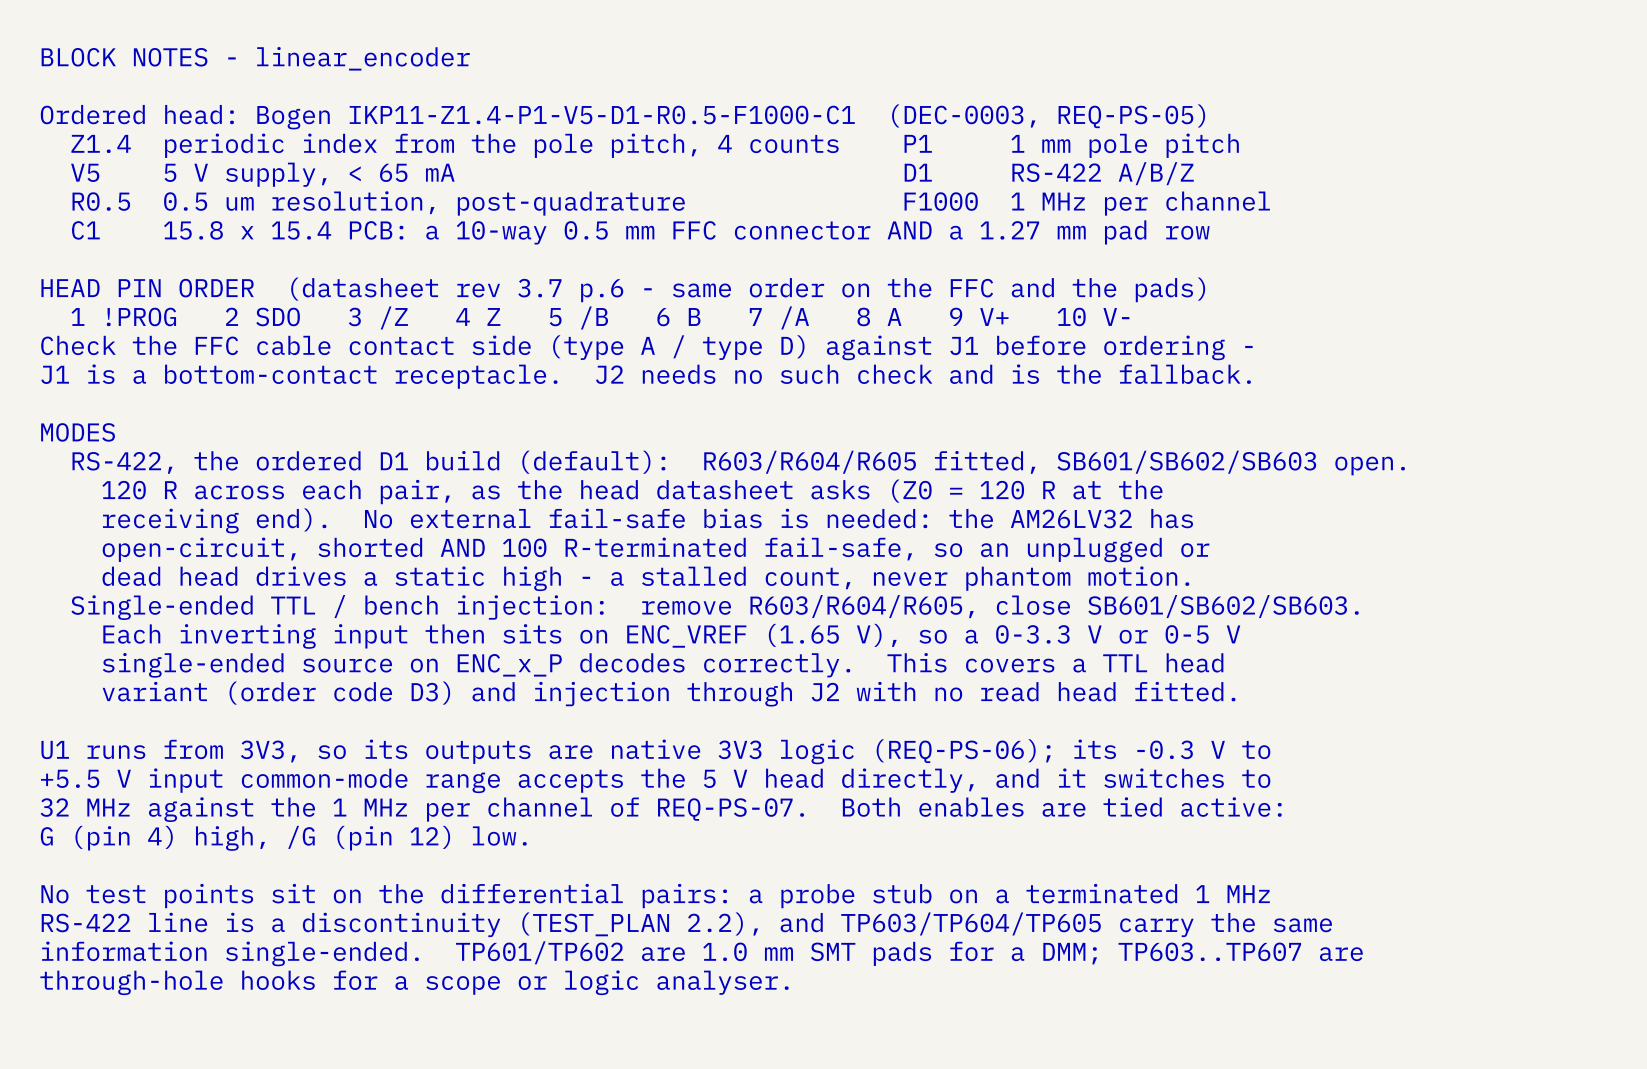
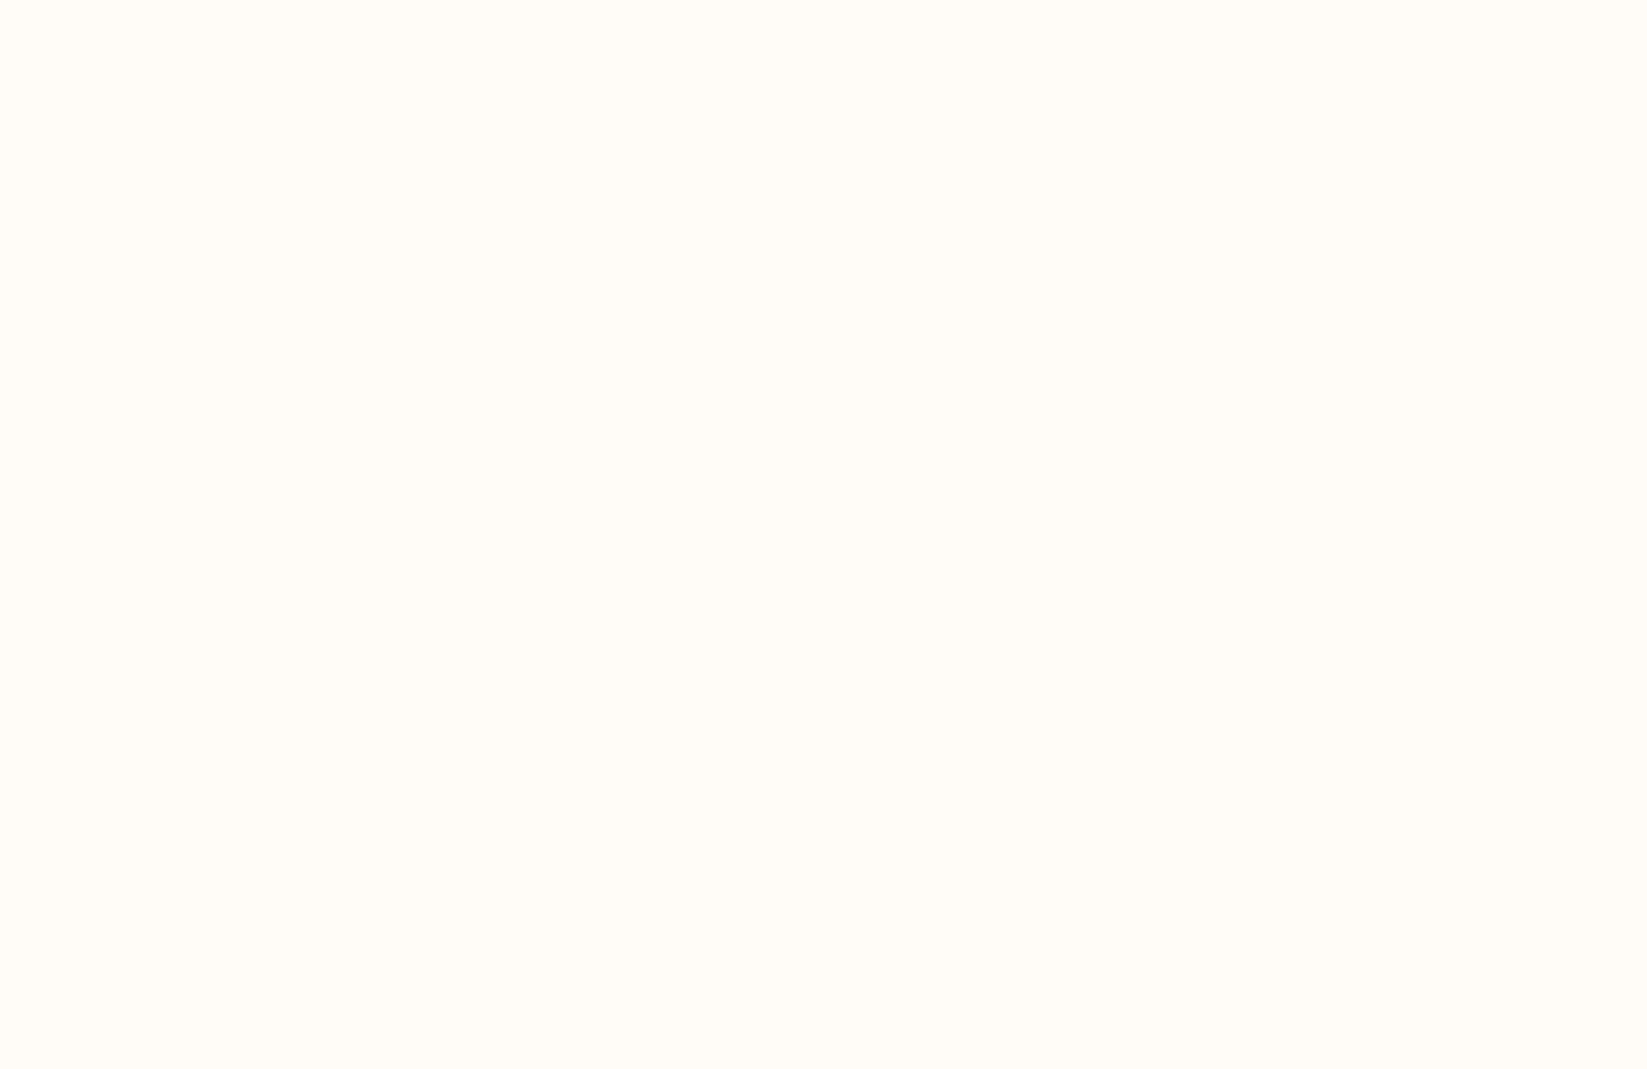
text: BLOCK NOTES - linear_encoder (255, 58) -> none
text: Ordered head: Bogen IKP11-Z1.4-P1-V5-D1-R0.5-F1000-C1 (DEC-0003, REQ-PS-05) (622, 116) -> none
text: Z1.4 periodic index from the pole pitch, 4 counts P1 1 mm pole pitch (655, 145) -> none
text: V5 5 V supply, < 65 mA D1 RS-422 A/B/Z (632, 174) -> none
text: R0.5 0.5 um resolution, post-quadrature F1000 1 MHz per channel (671, 203) -> none
text: C1 15.8 x 15.4 PCB: a 10-way 0.5 mm FFC connector AND a 1.27 mm pad row (640, 232) -> none
text: HEAD PIN ORDER (datasheet rev 3.7 p.6 - same order on the FFC and the pads) (623, 289) -> none
text: 1 !PROG 2 SDO 3 /Z 4 Z 5 /B 6 B 7 /A 8 A 9 V+ 10 V- (600, 317) -> none
text: Check the FFC cable contact side (type A / type D) against J1 before ordering - (646, 347) -> none
text: J1 is a bottom-contact receptacle. J2 needs no such check and is the fallback. (646, 376) -> none
text: MODES (78, 432) -> none
text: RS-422, the ordered D1 build (default): R603/R604/R605 fitted, SB601/SB602/SB603 open. (738, 463) -> none
text: 120 R across each pair, as the head datasheet asks (Z0 = 120 R at the (632, 491) -> none
text: receiving end). No external fail-safe bias is needed: the AM26LV32 has (648, 520) -> none
text: open-circuit, shorted AND 100 R-terminated fail-safe, so an unplugged or (656, 549) -> none
text: dead head drives a static high - a stalled count, never phantom motion. (645, 578) -> none
text: Single-ended TTL / bench injection: remove R603/R604/R605, close SB601/SB602/SB603. (715, 607) -> none
text: Each inverting input then sits on ENC_VREF (1.65 V), so a 0-3.3 V or 0-5 V (671, 636) -> none
text: single-ended source on ENC_x_P decodes correctly. This covers a TTL head (663, 665) -> none
text: variant (order code D3) and injection through J2 with no read head fitted. (669, 694) -> none
text: U1 runs from 3V3, so its outputs are native 3V3 logic (REQ-PS-06); its -0.3 V to (655, 751) -> none
text: +5.5 V input common-mode range accepts the 5 V head directly, and it switches to (655, 780) -> none
text: 32 MHz against the 1 MHz per channel of REQ-PS-07. Both enables are tied active: (661, 809) -> none
text: G (pin 4) high, /G (pin 12) low. (283, 838) -> none
text: No test points sit on the differential pairs: a probe stub on a terminated 1 MHz (655, 896) -> none
text: RS-422 line is a discontinuity (TEST_PLAN 2.2), and TP603/TP604/TP605 carry the same (686, 924) -> none
text: information single-ended. TP601/TP602 are 1.0 mm SMT pads for a DMM; TP603..TP607 are (702, 953) -> none
text: through-hole hooks for a scope or logic analyser. (414, 982) -> none

